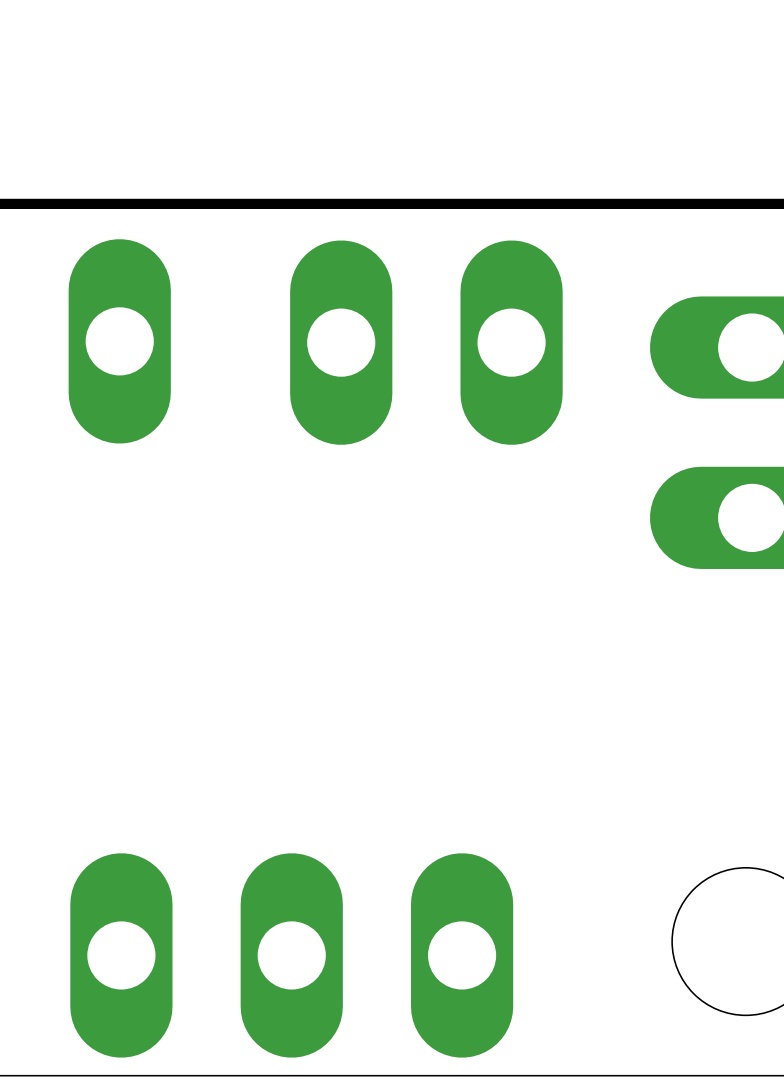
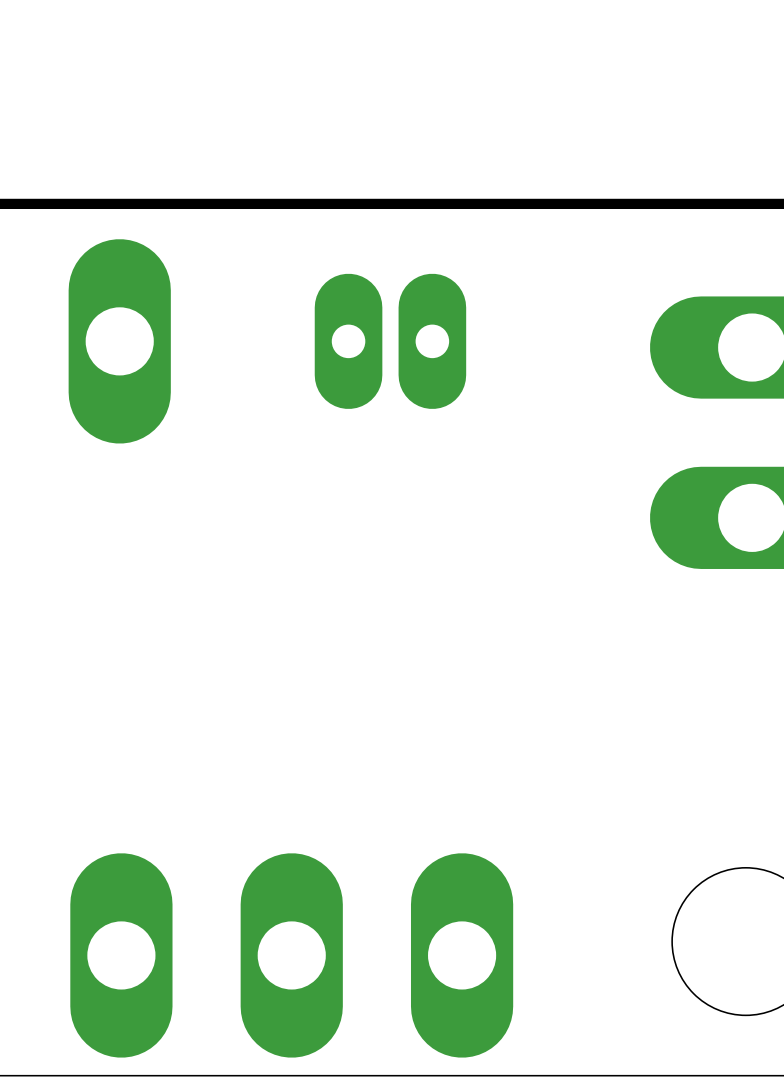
part footprint: [290, 240, 563, 445] -> [314, 273, 467, 409]

